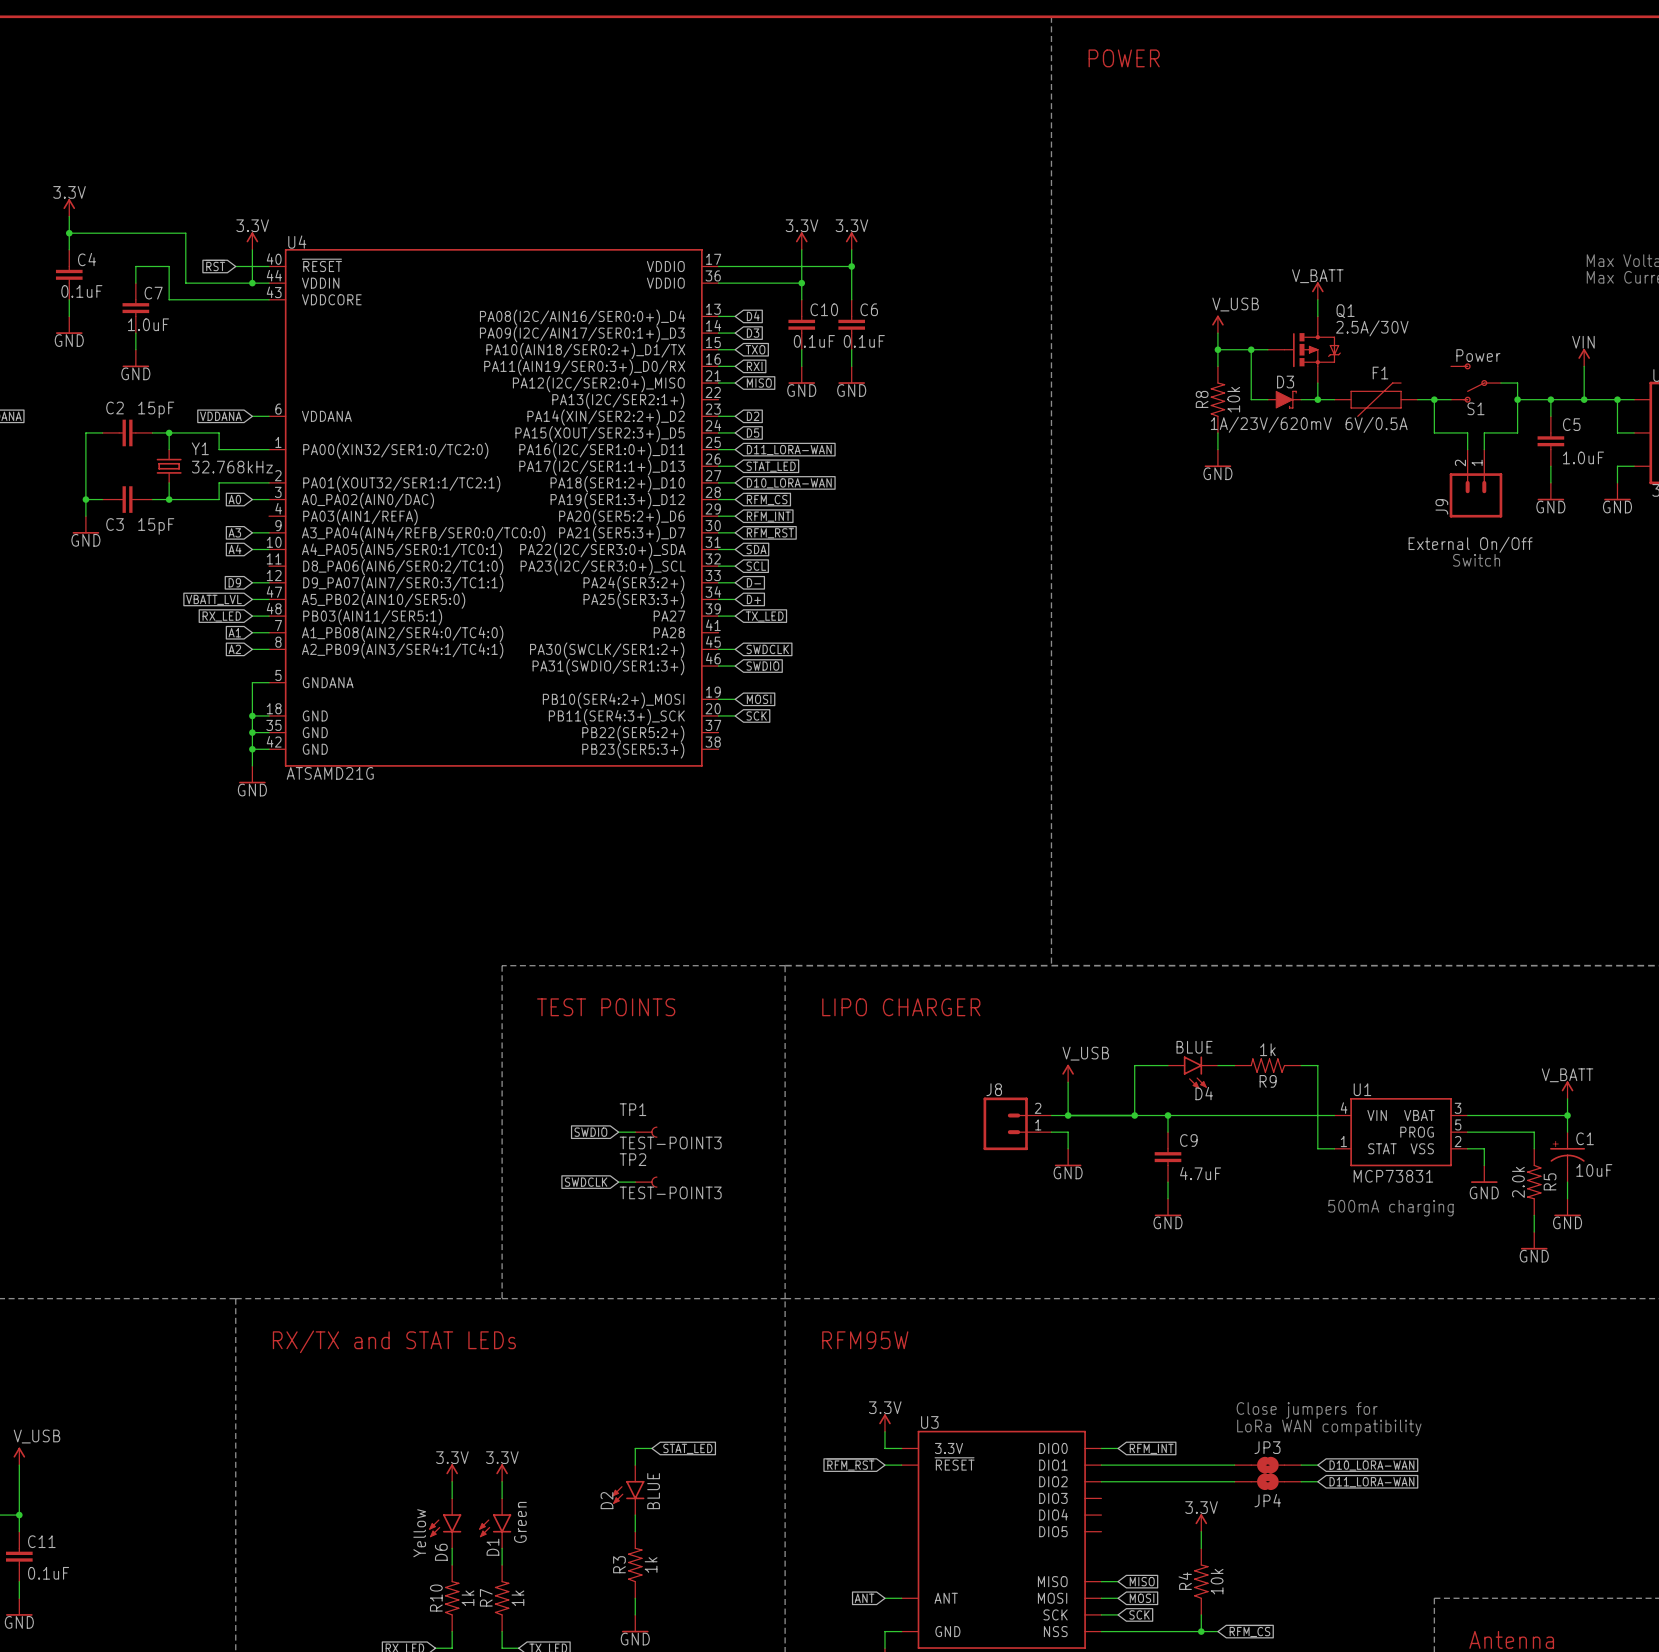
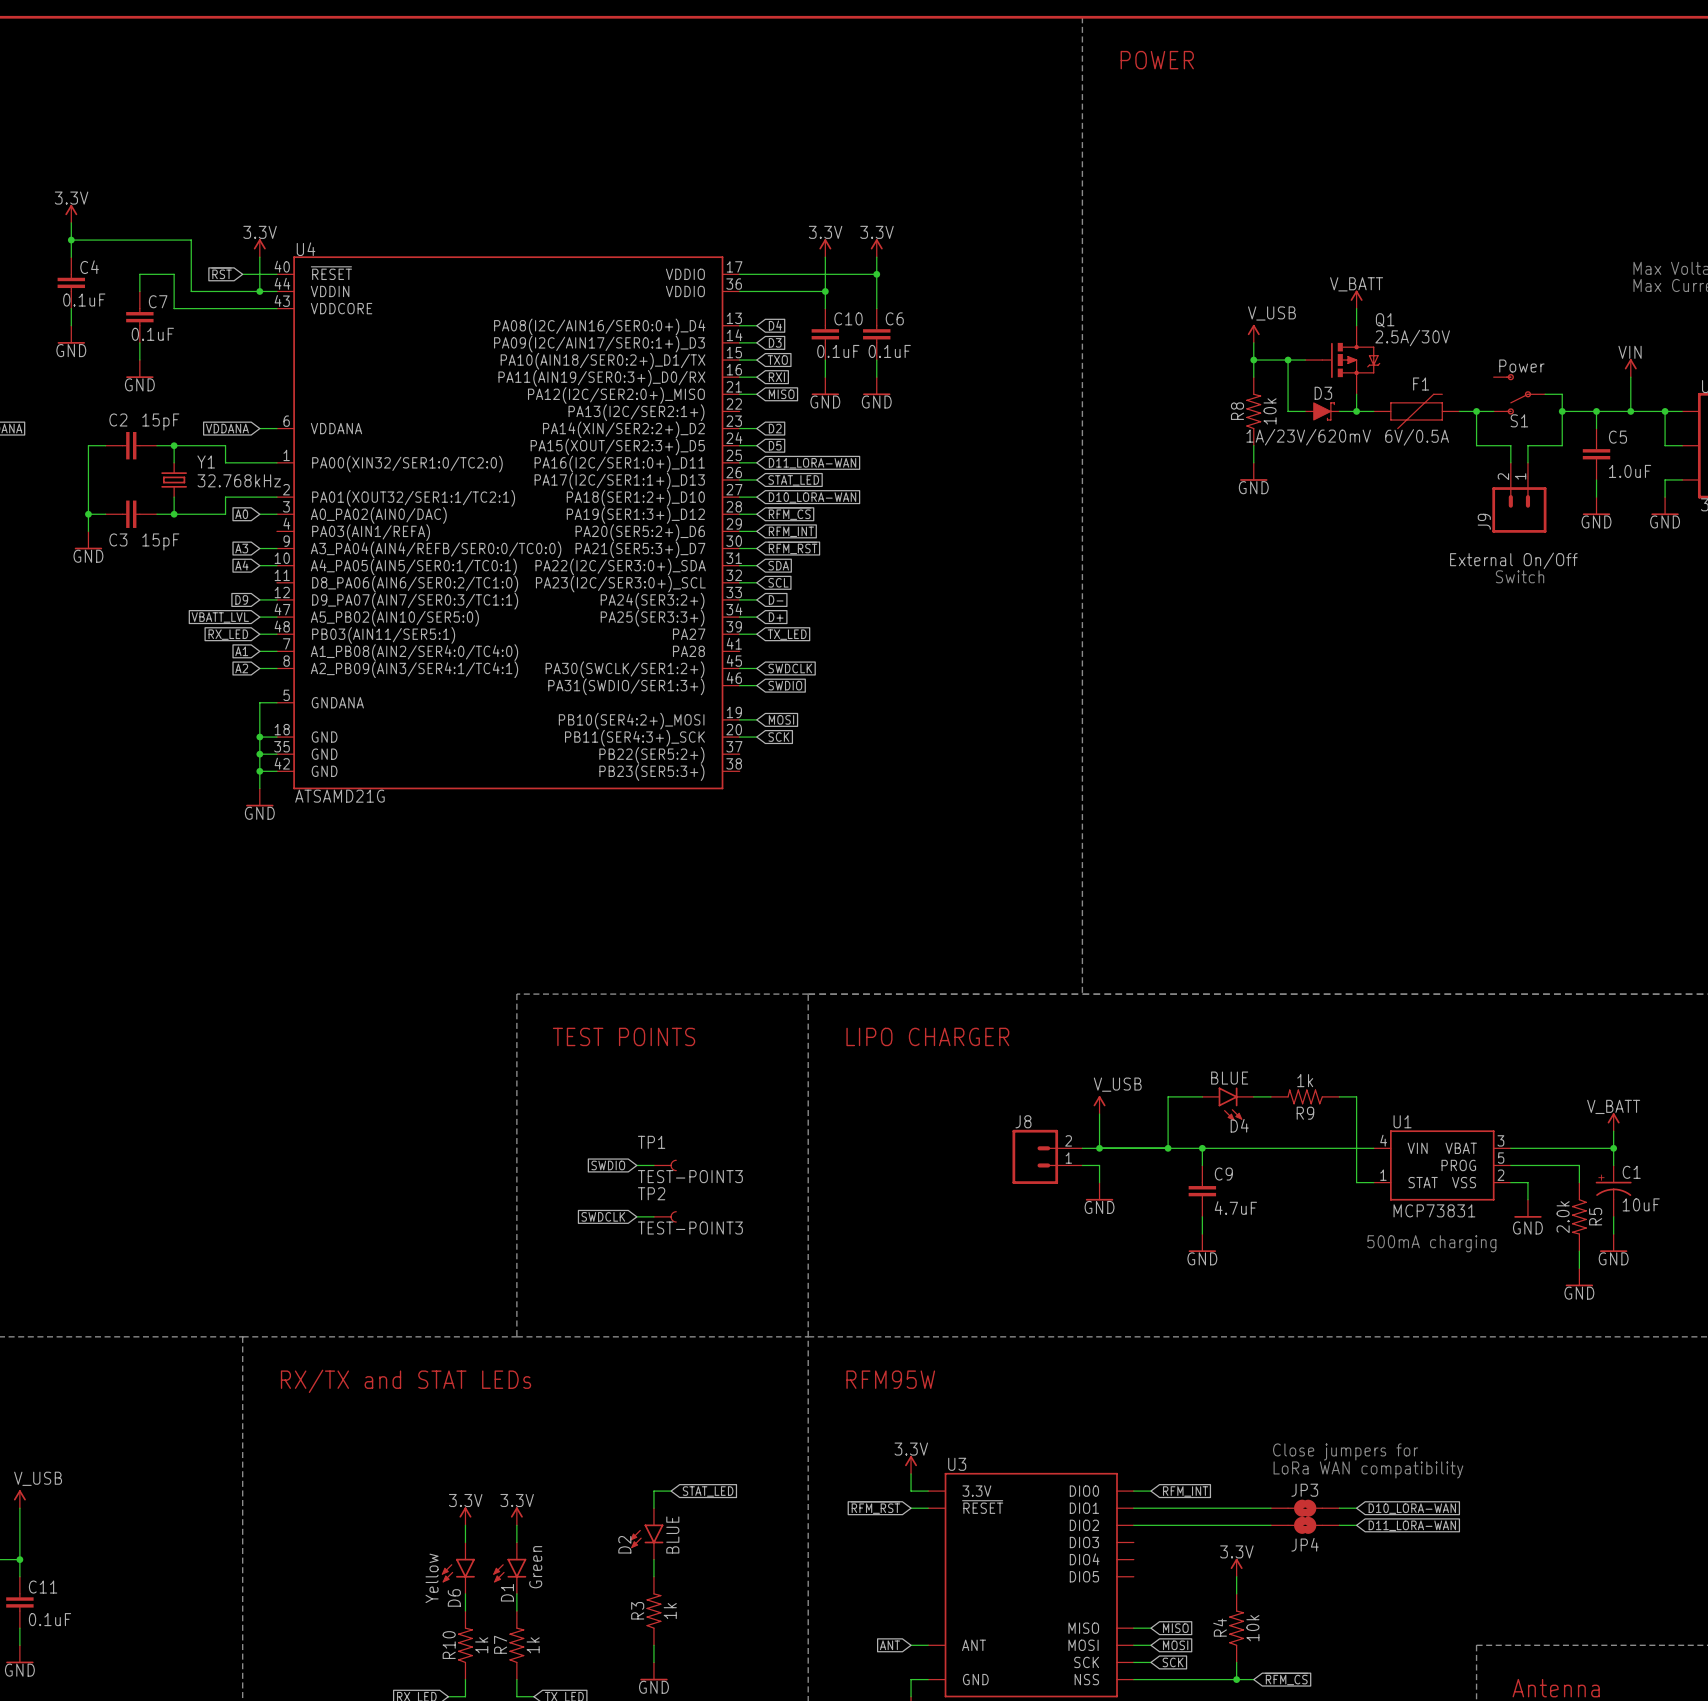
C7 value: 1.0uF (148, 324) -> 0.1uF (152, 334)

